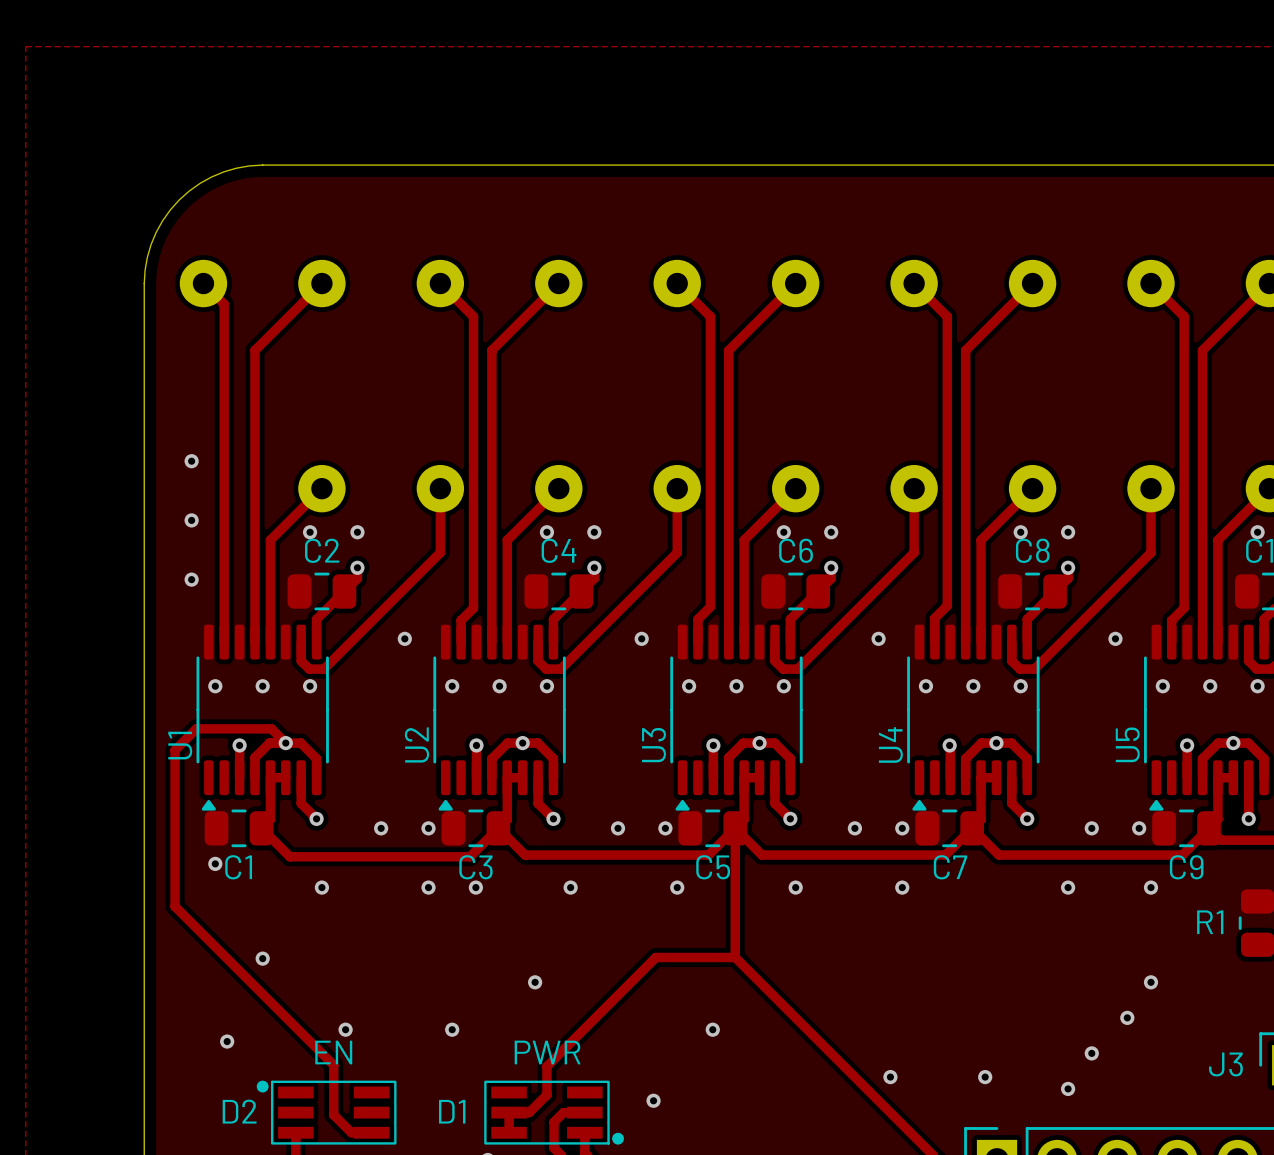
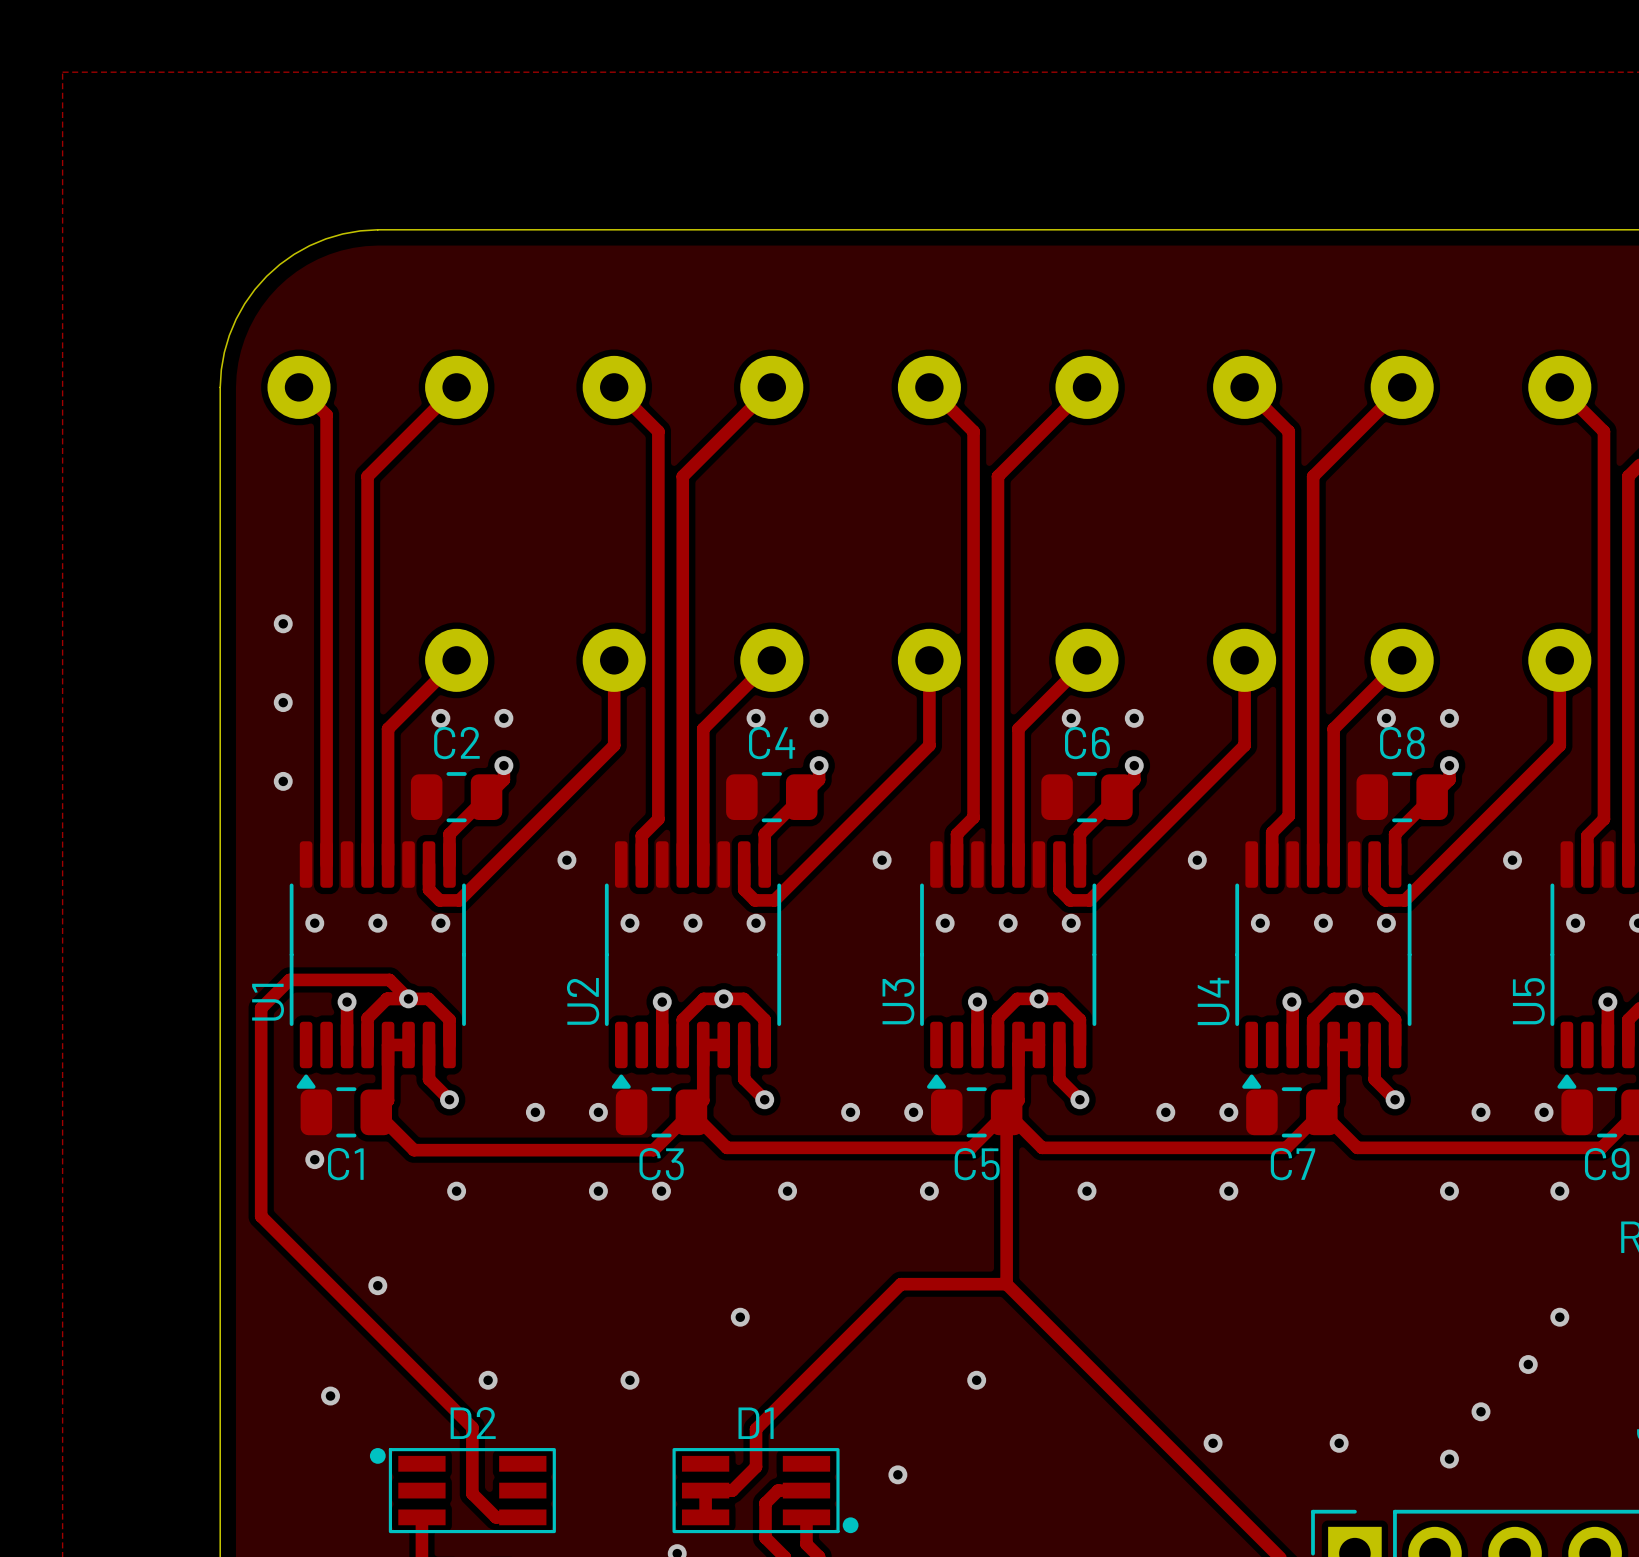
text: EN (333, 1052) -> none
text: PWR (547, 1052) -> none
D2 name position: D2 (239, 1111) -> D2 (473, 1423)
D1 name position: D1 (452, 1111) -> D1 (756, 1423)

